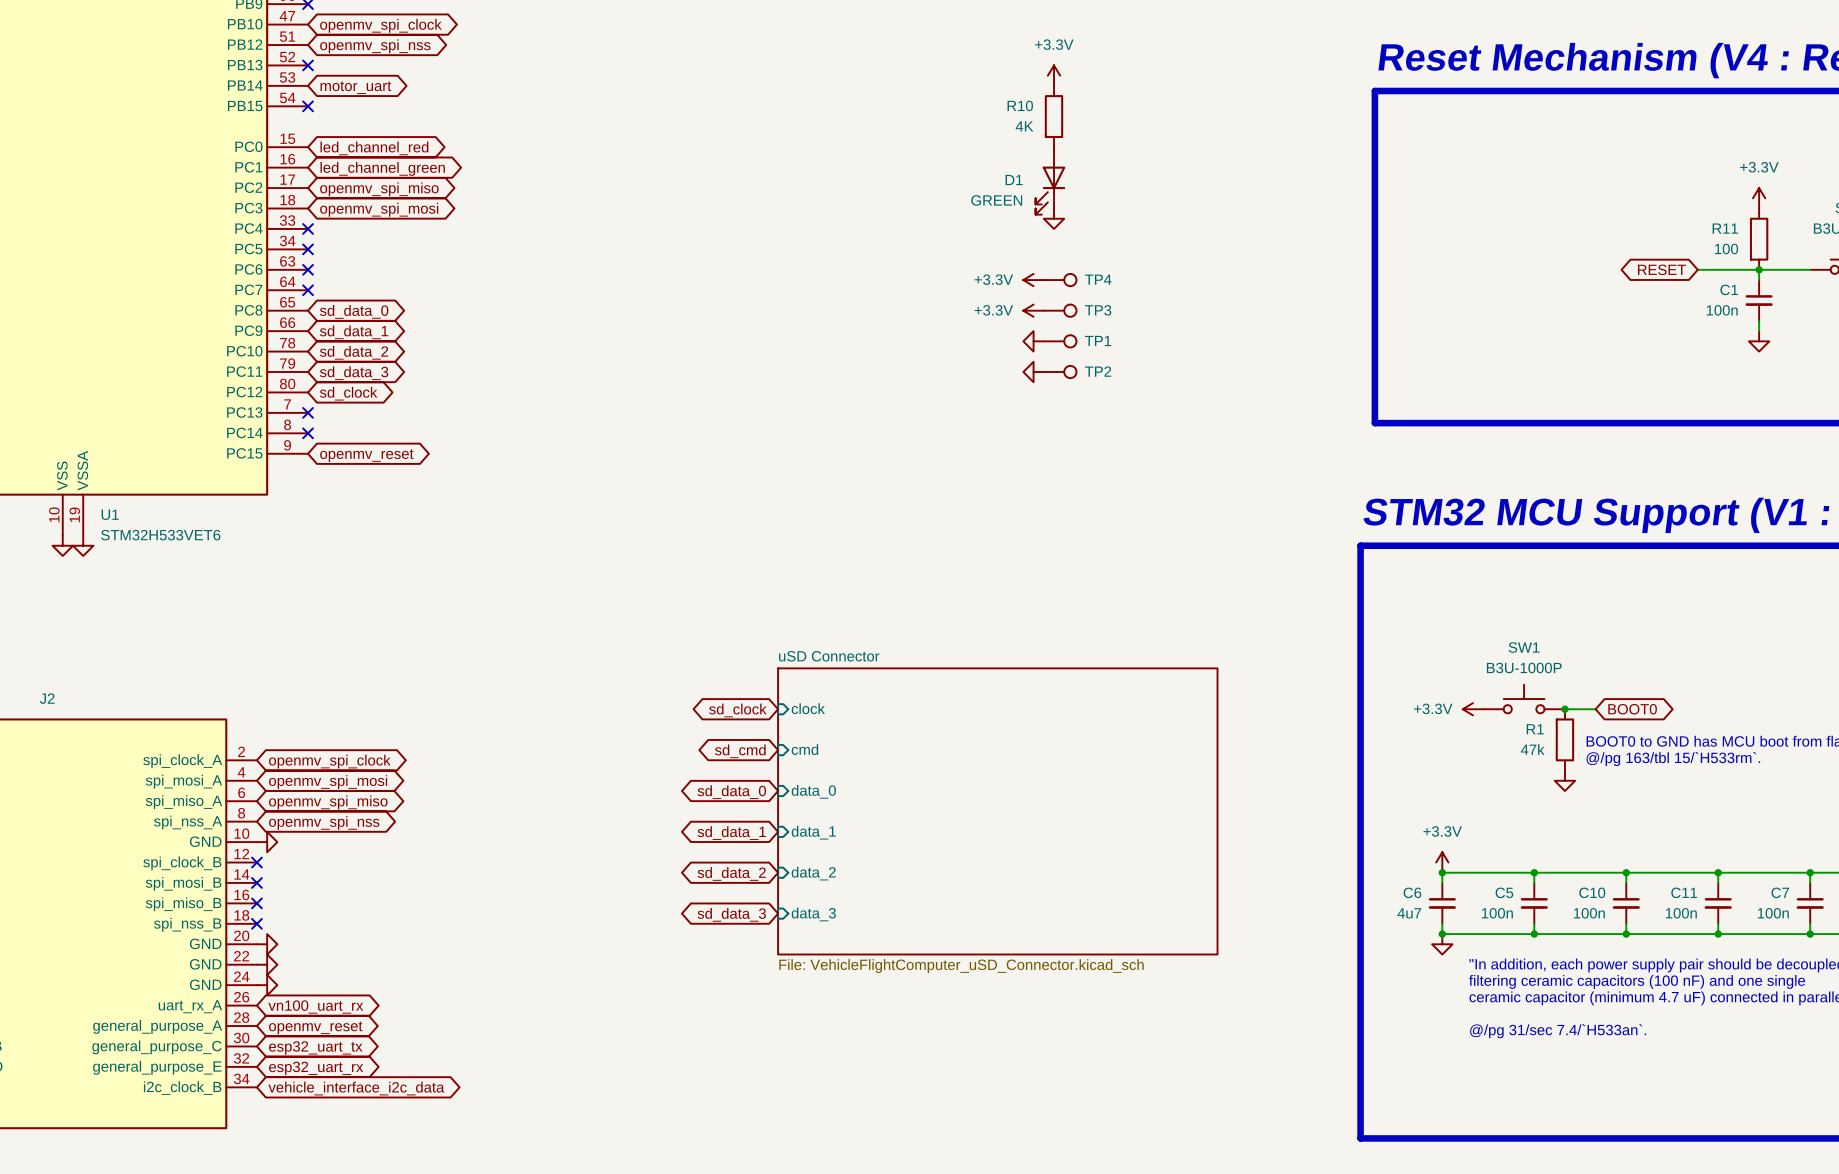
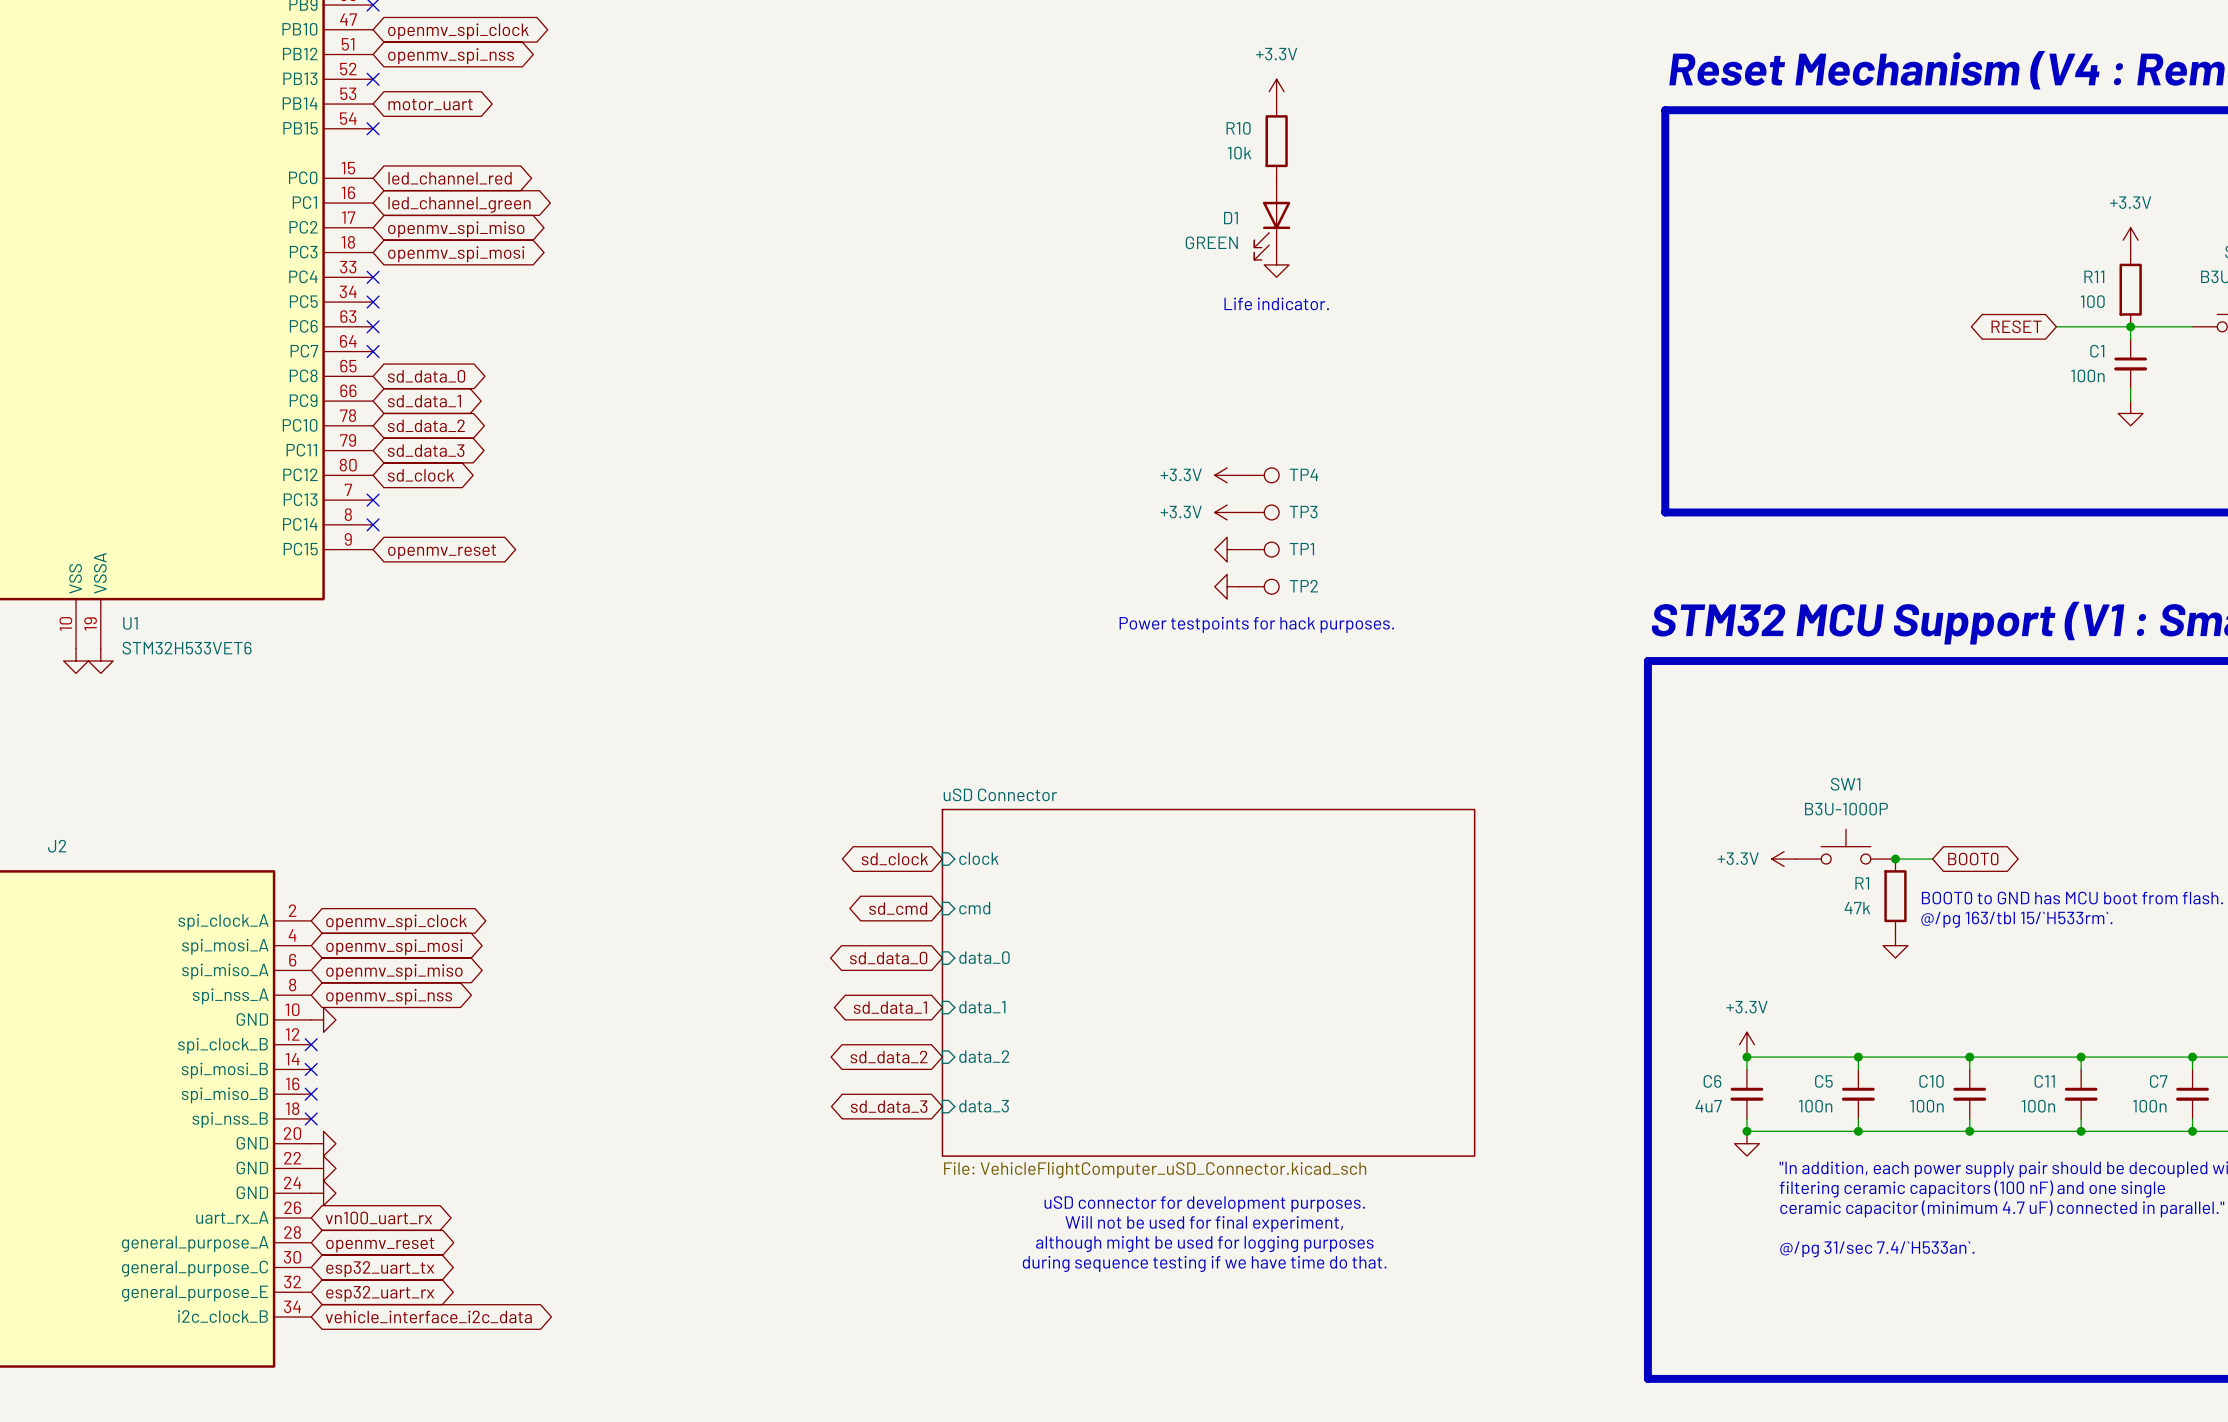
R10 value: 4K (1024, 126) -> 10k (1239, 153)
text: none -> Life indicator. (1276, 303)
power symbol: +3.3V (1033, 280) -> none
TP4 position: (1060, 280) -> (1259, 475)
power symbol: +3.3V (1033, 310) -> none
TP3 position: (1060, 310) -> (1259, 512)
power symbol: (1033, 341) -> none
TP1 position: (1060, 341) -> (1259, 549)
power symbol: (1033, 372) -> none
TP2 position: (1060, 372) -> (1259, 586)
power symbol: none -> +3.3V (1227, 475)
power symbol: none -> +3.3V (1227, 512)
power symbol: none -> (1227, 549)
power symbol: none -> (1227, 586)
text: none -> Power testpoints for hack purposes. (1256, 624)
text: none -> uSD connector for development purposes. (1204, 1204)
text: none -> Will not be used for final experiment, (1204, 1224)
text: none -> although might be used for logging purposes (1204, 1244)
text: none -> during sequence testing if we have time do that. (1204, 1263)

